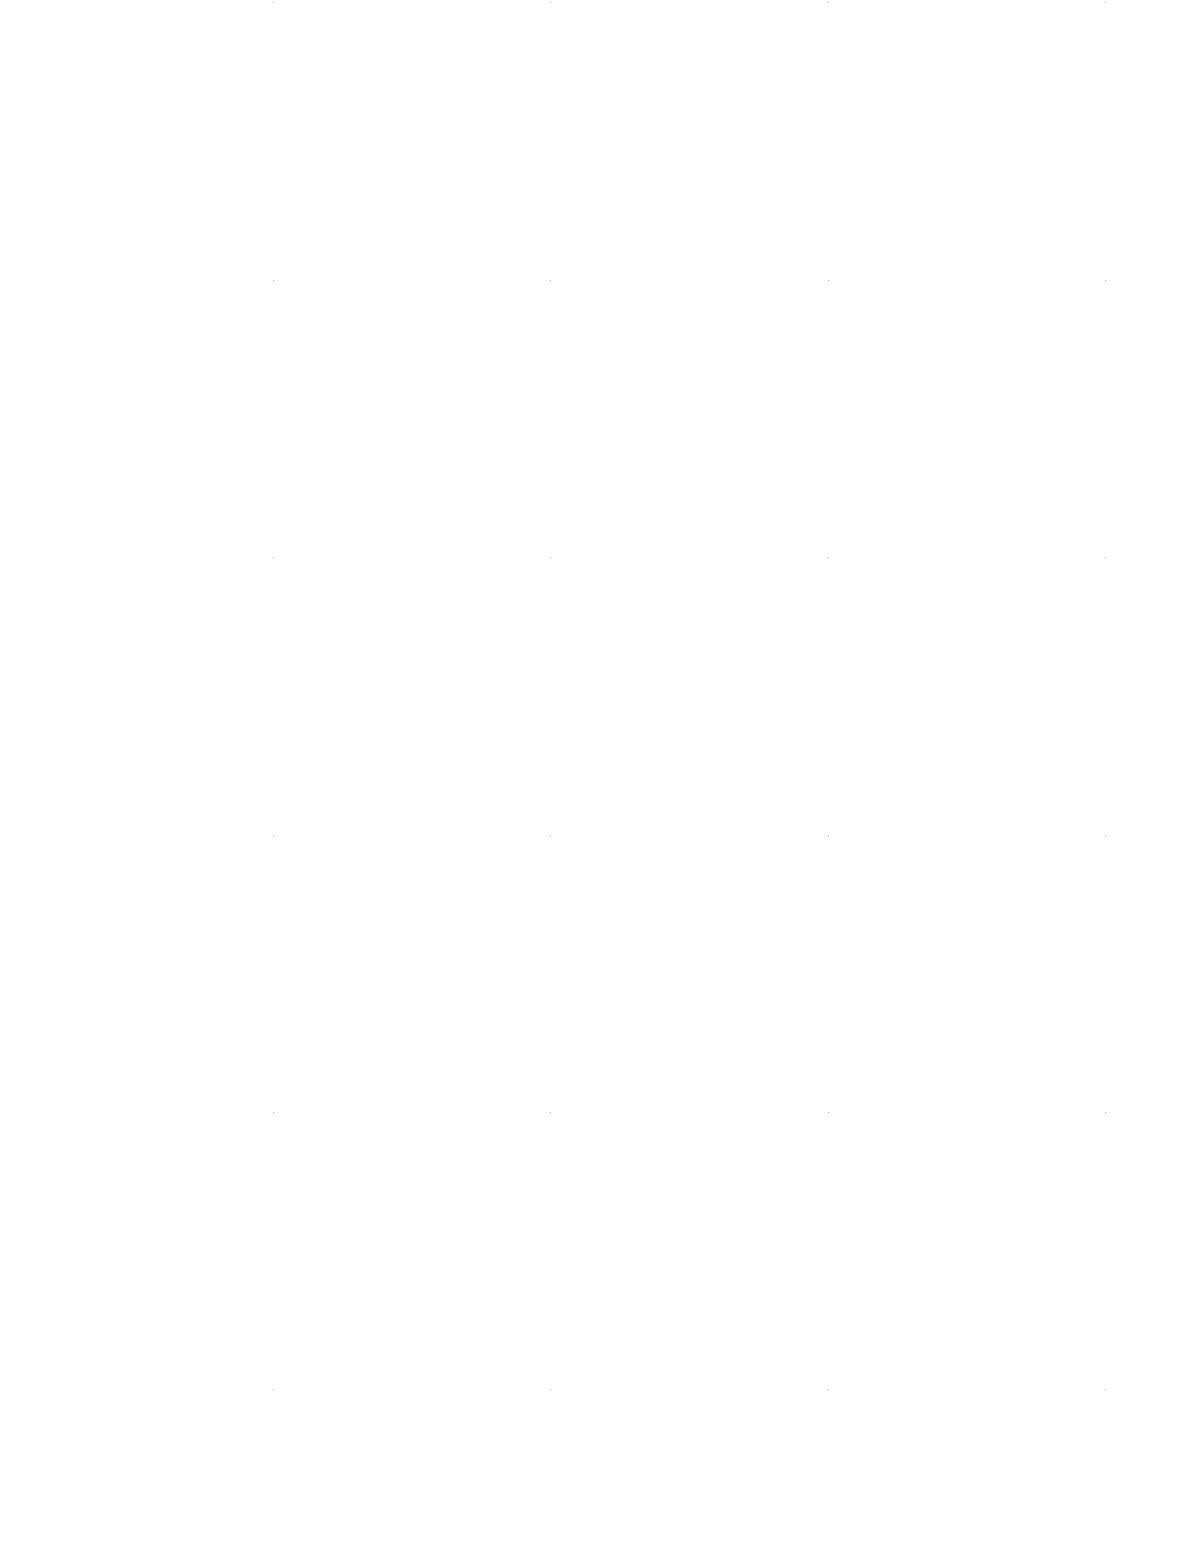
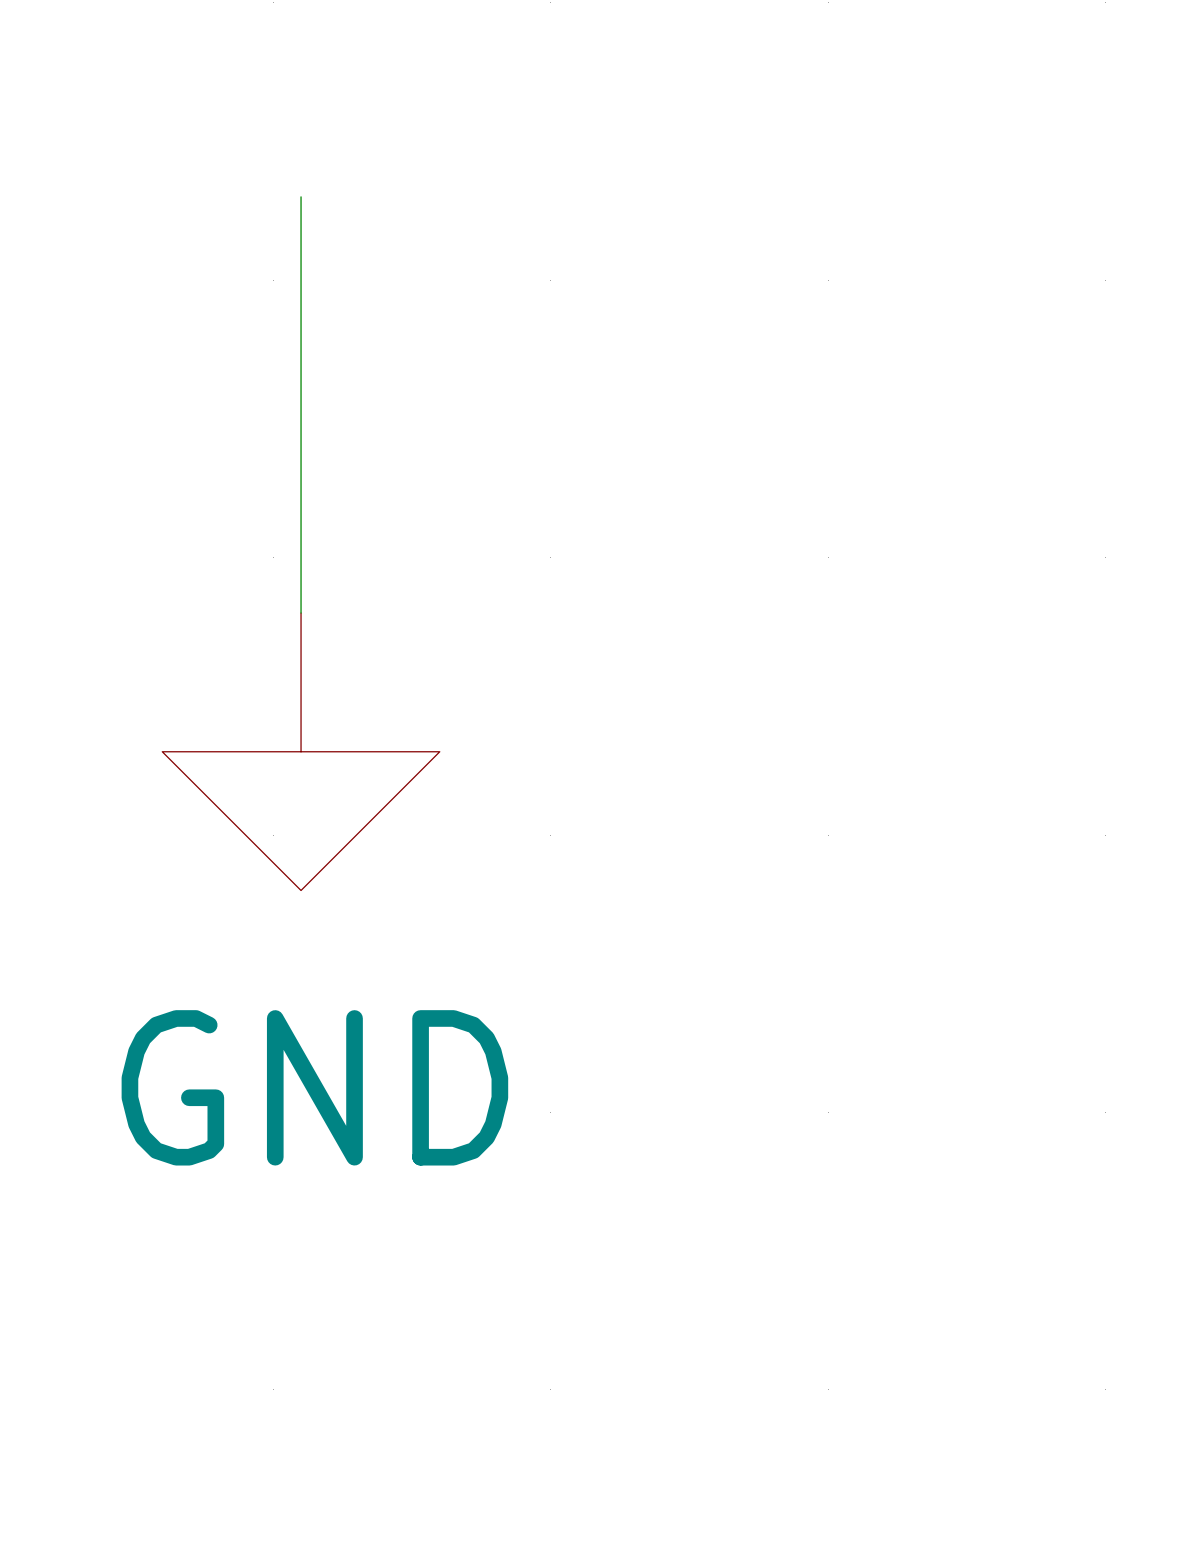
wire: none -> (301, 196) (301, 613)
power symbol: none -> GND (301, 751)

